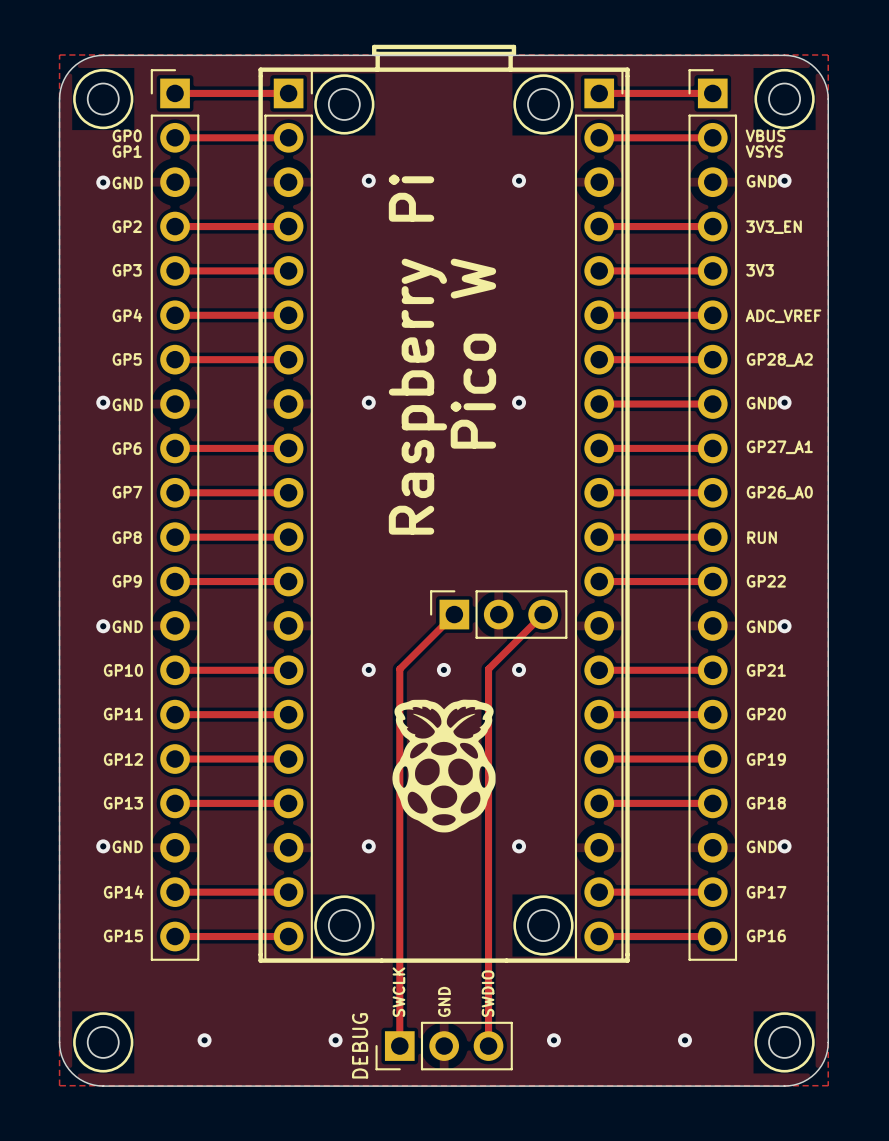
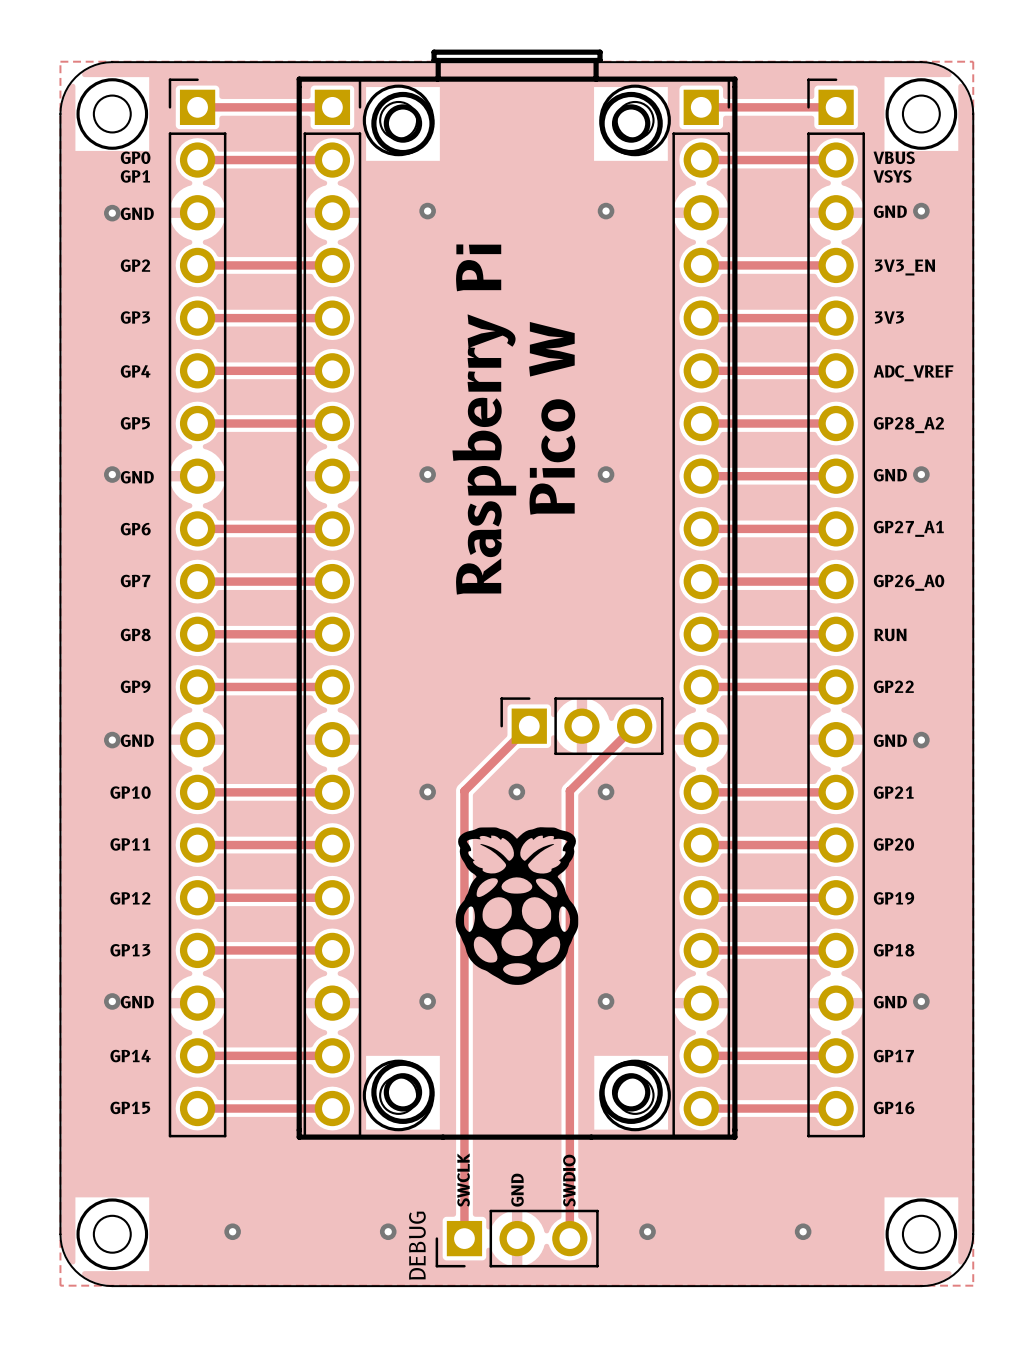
drawing shape: [258, 44, 630, 963] -> [296, 49, 738, 1140]

